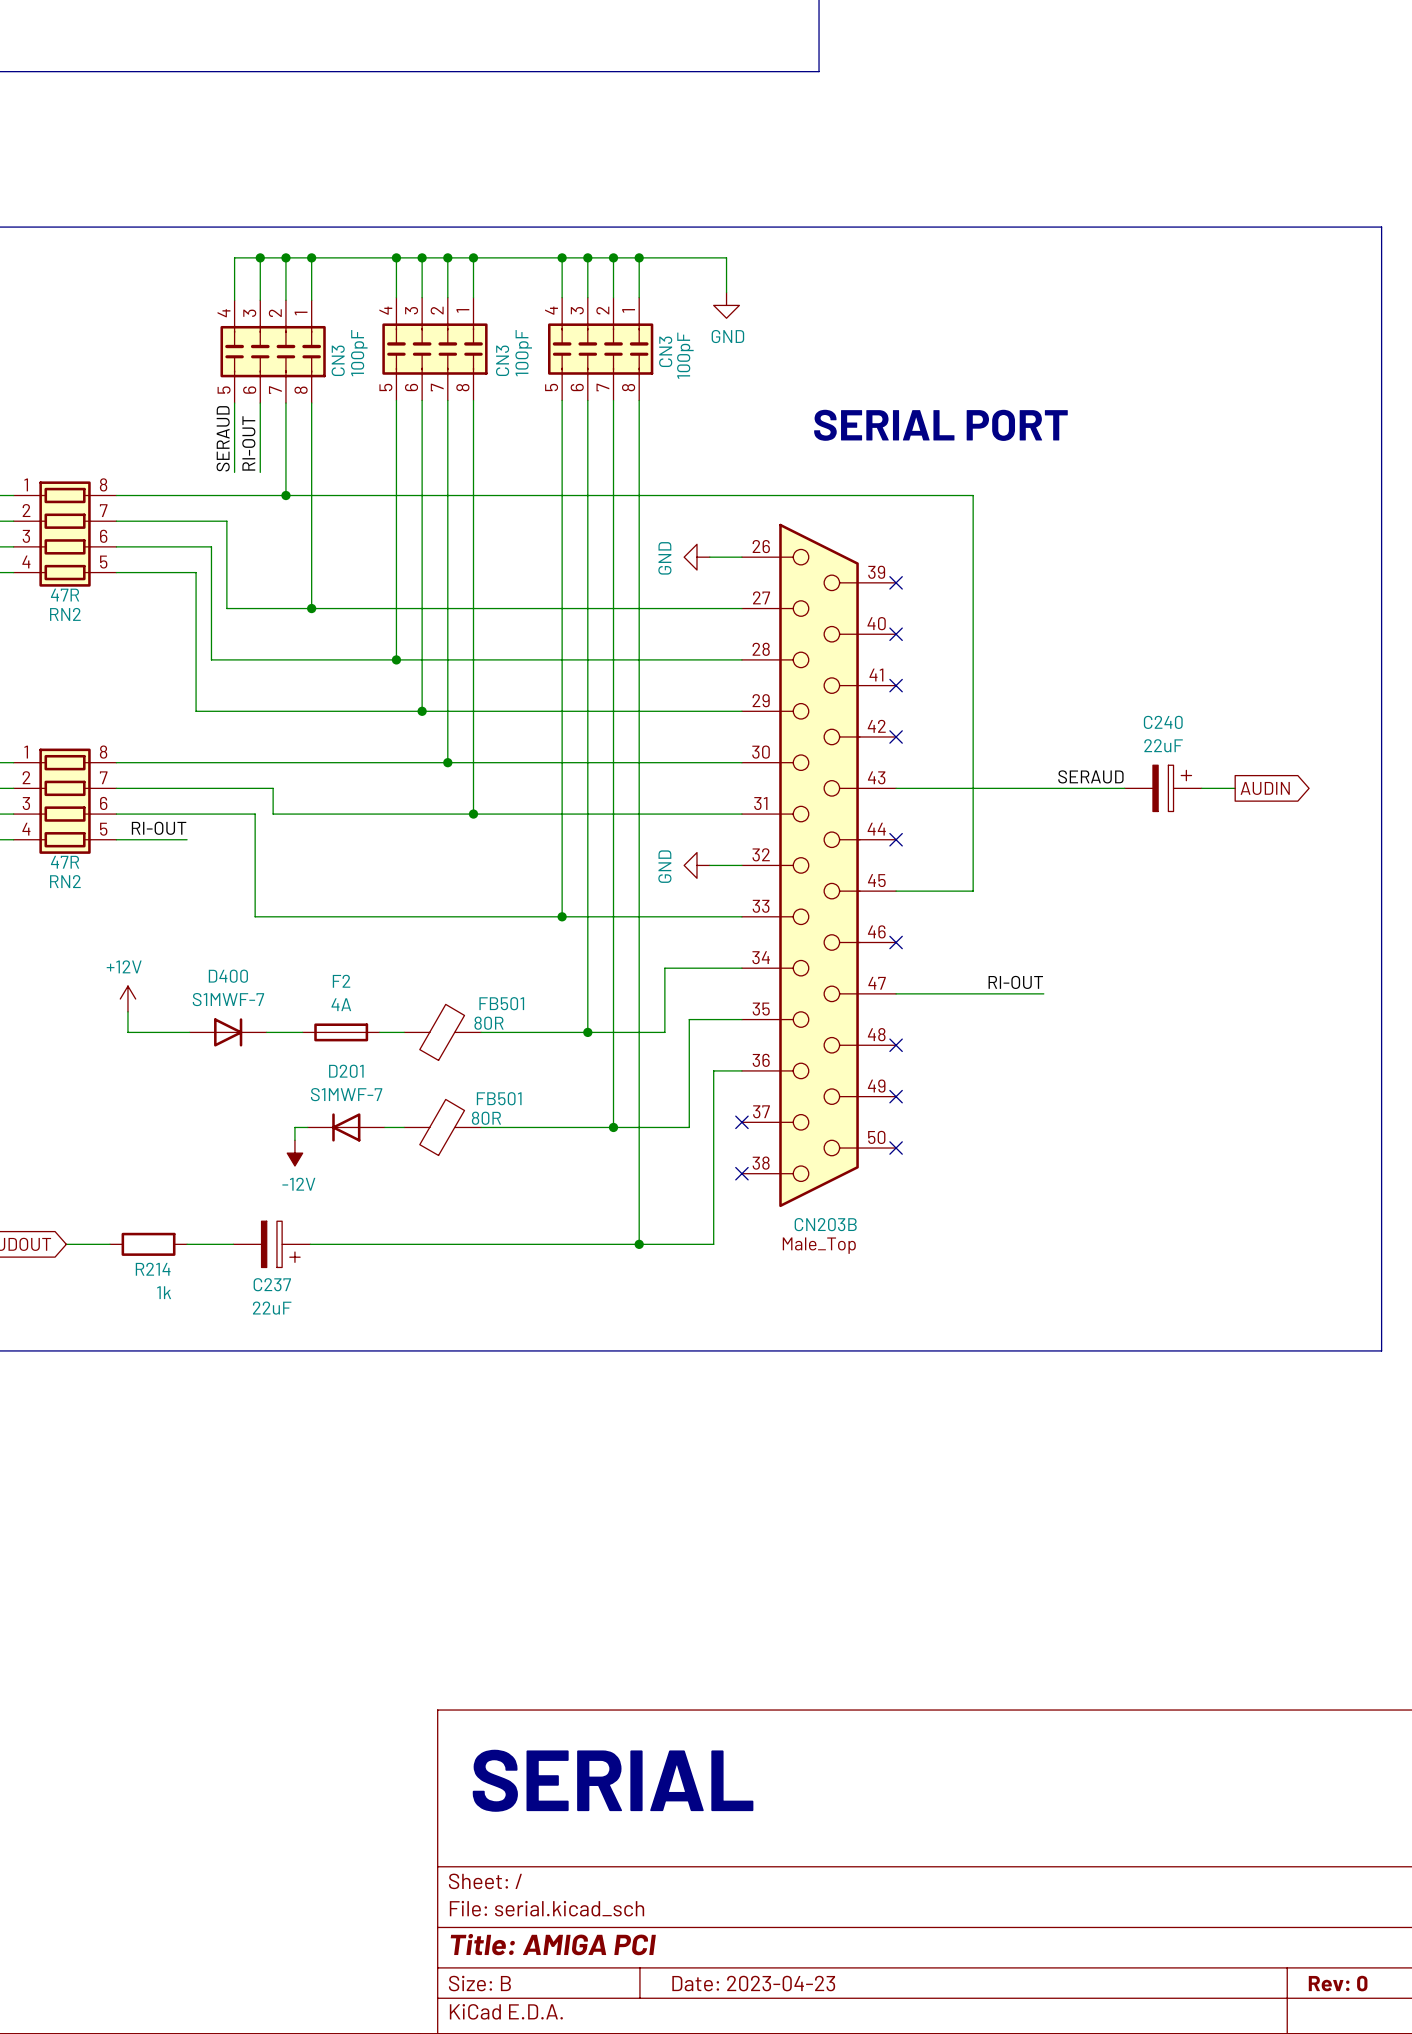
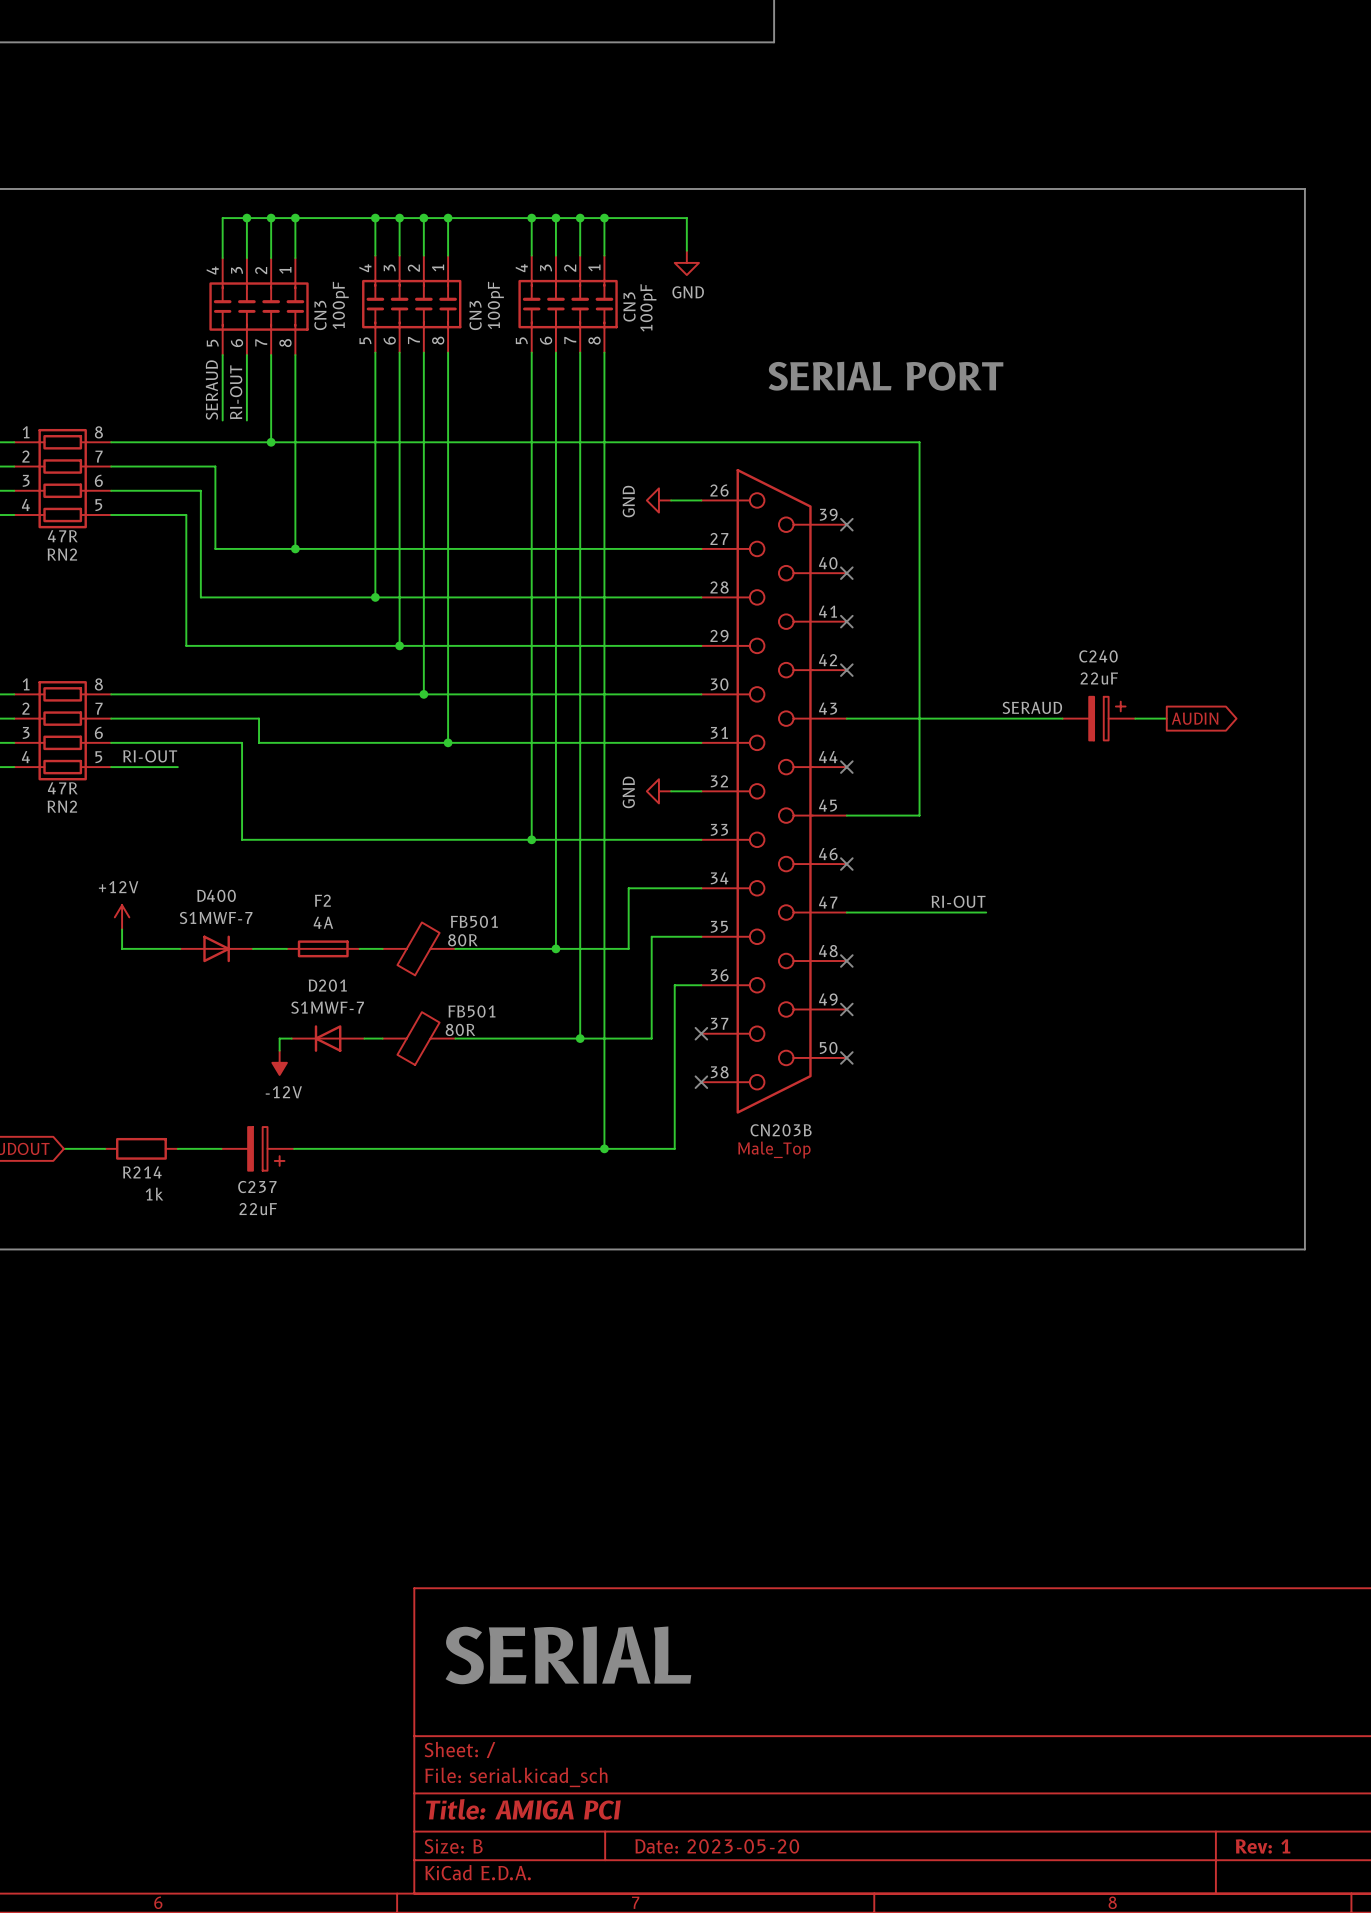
title block: Date: 2023-04-23 (753, 1983) -> Date: 2023-05-20 (717, 1846)
title block: Rev: 0 (1338, 1983) -> Rev: 1 (1263, 1846)

